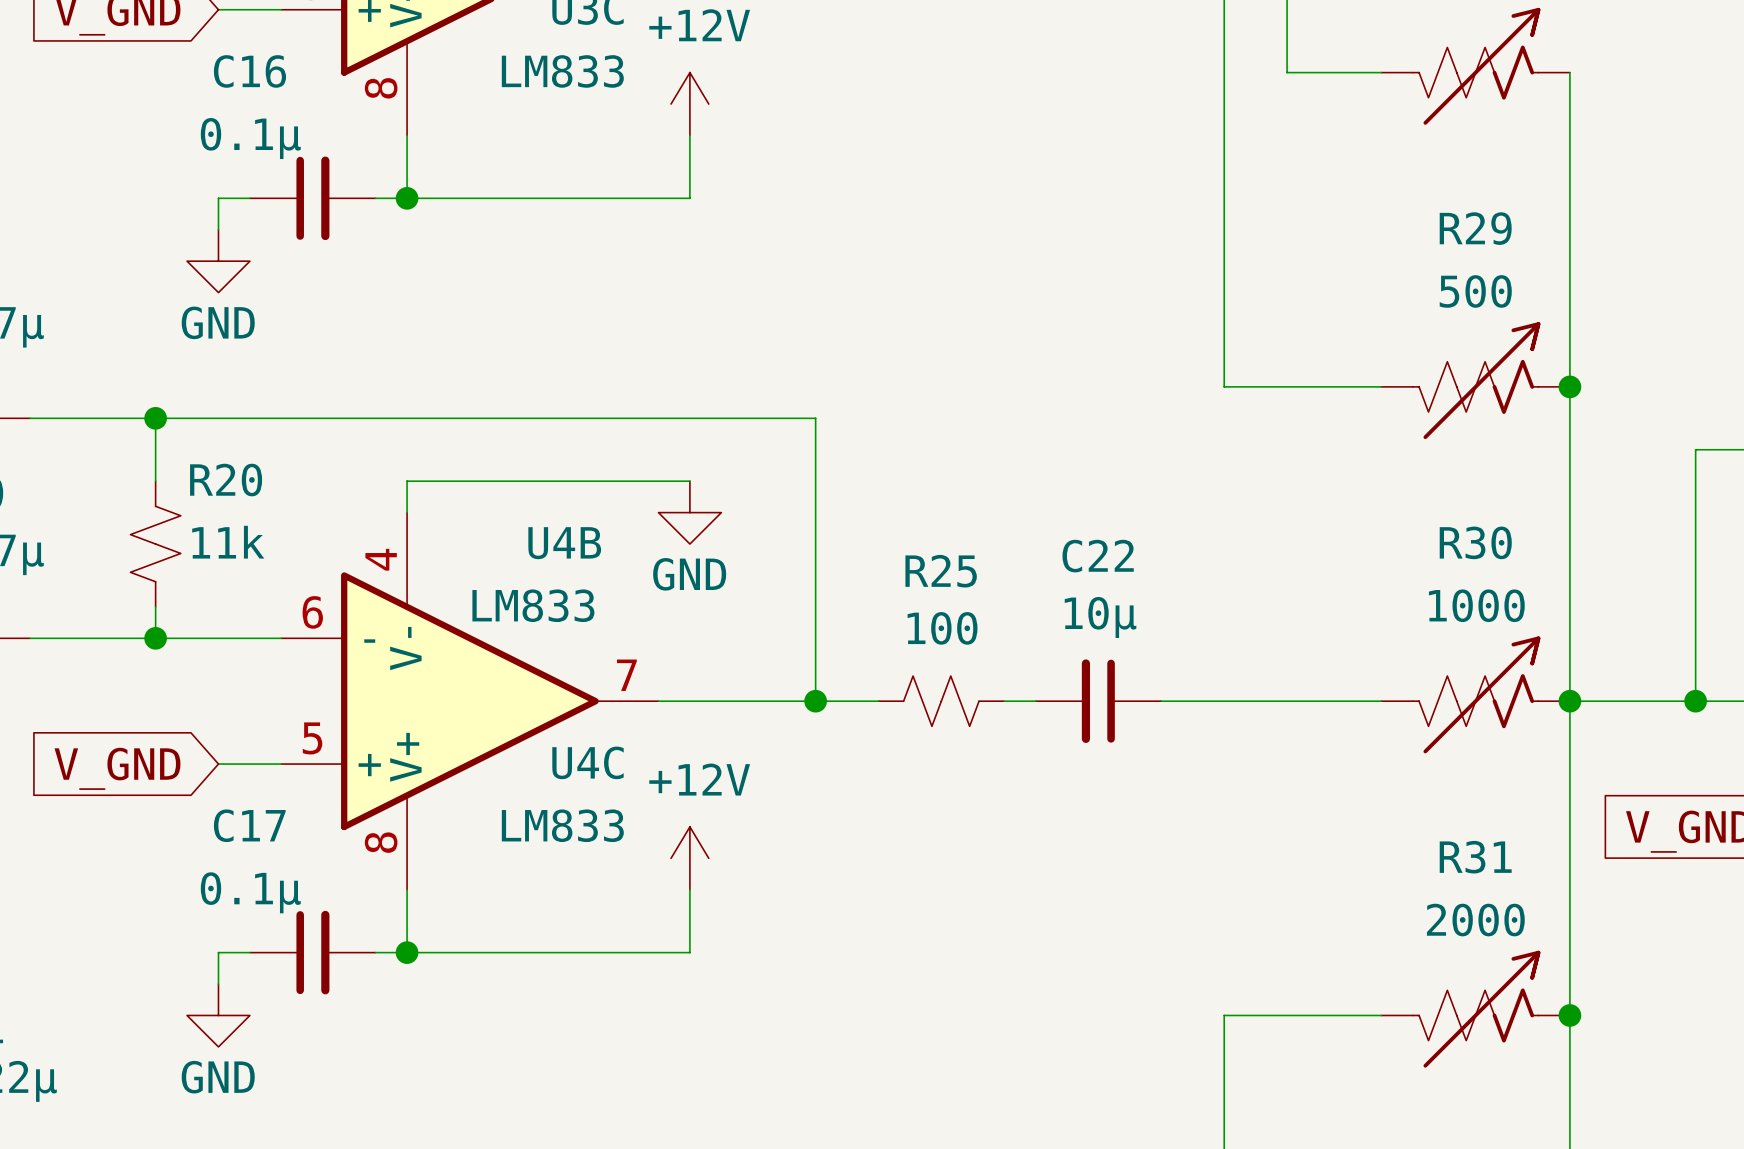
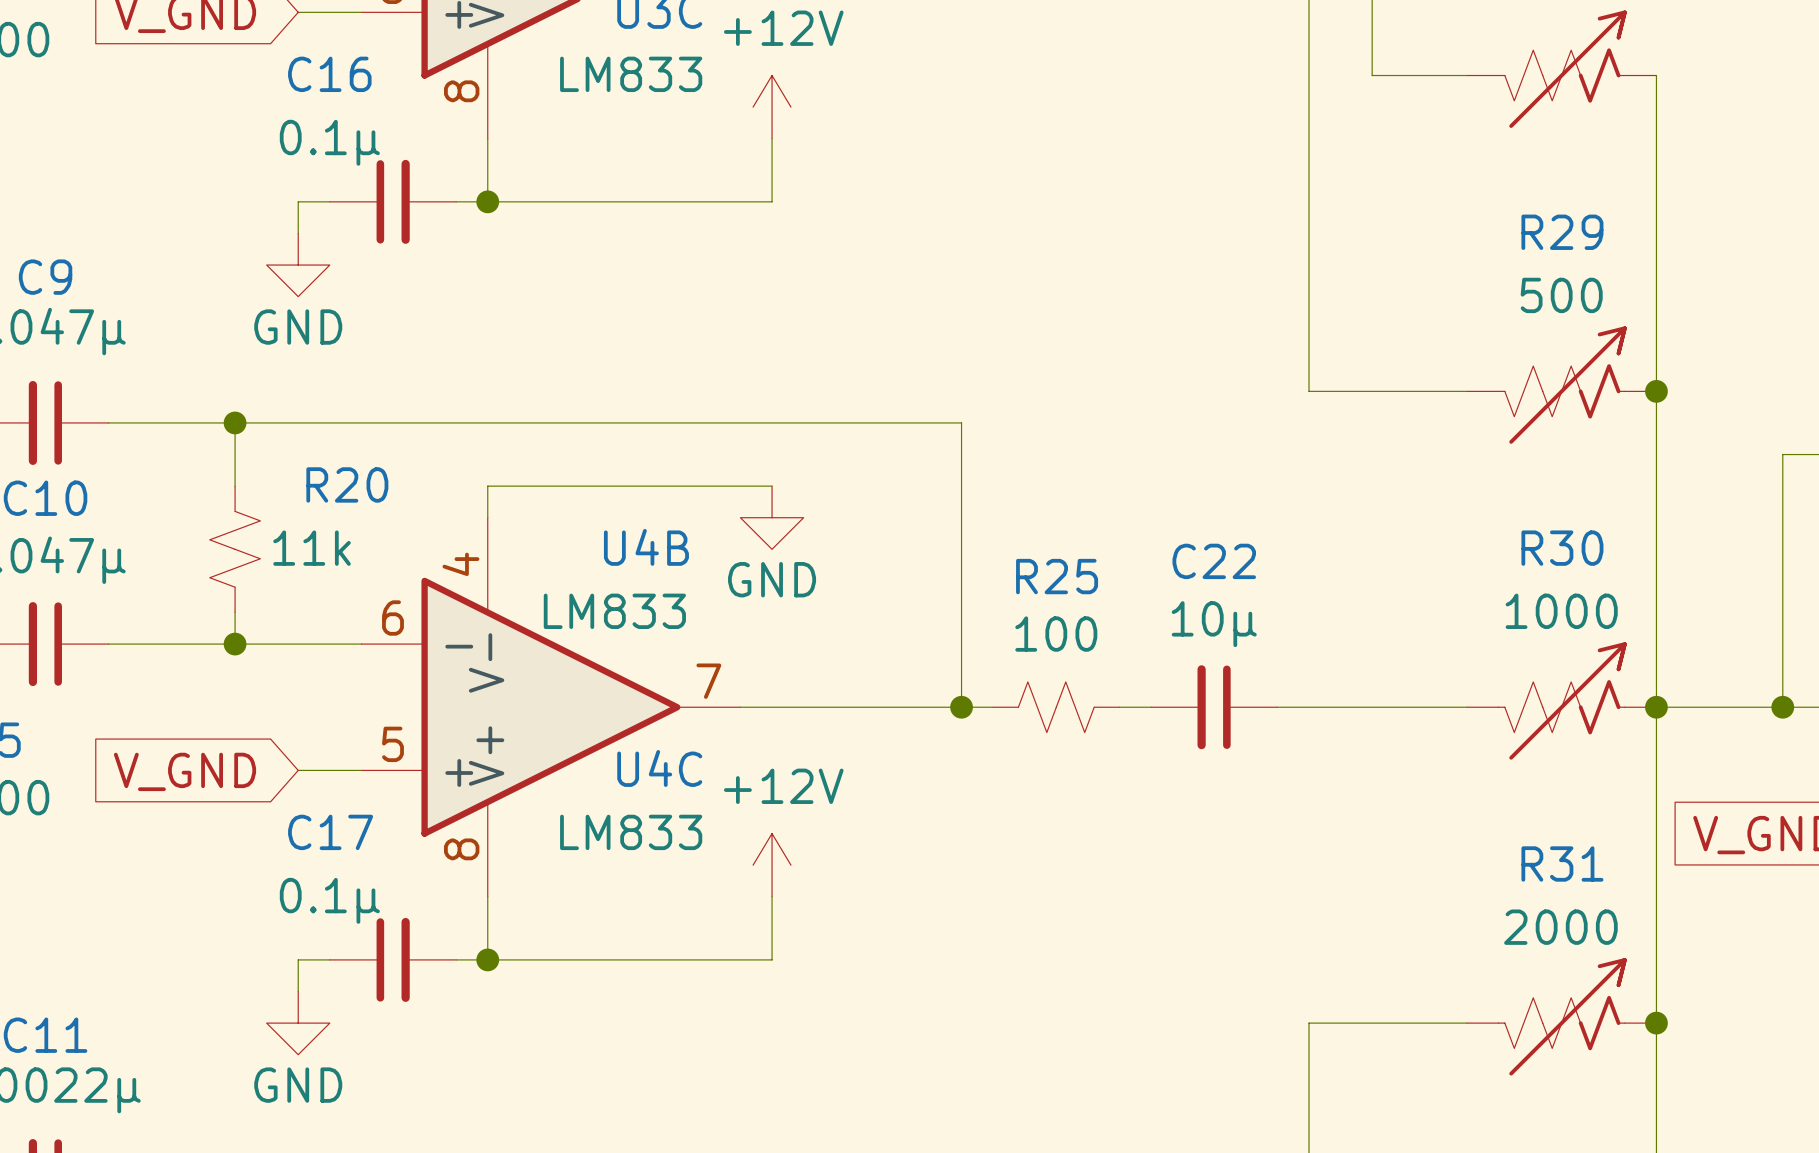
wire: (815, 418) (815, 701) -> (898, 422) (961, 422) (961, 707) (993, 707)
R20 name position: R20 (226, 480) -> R20 (347, 484)
junction position: (815, 701) -> (961, 707)
R25 position: (941, 701) -> (1056, 707)
C22 position: (1098, 701) -> (1214, 707)

